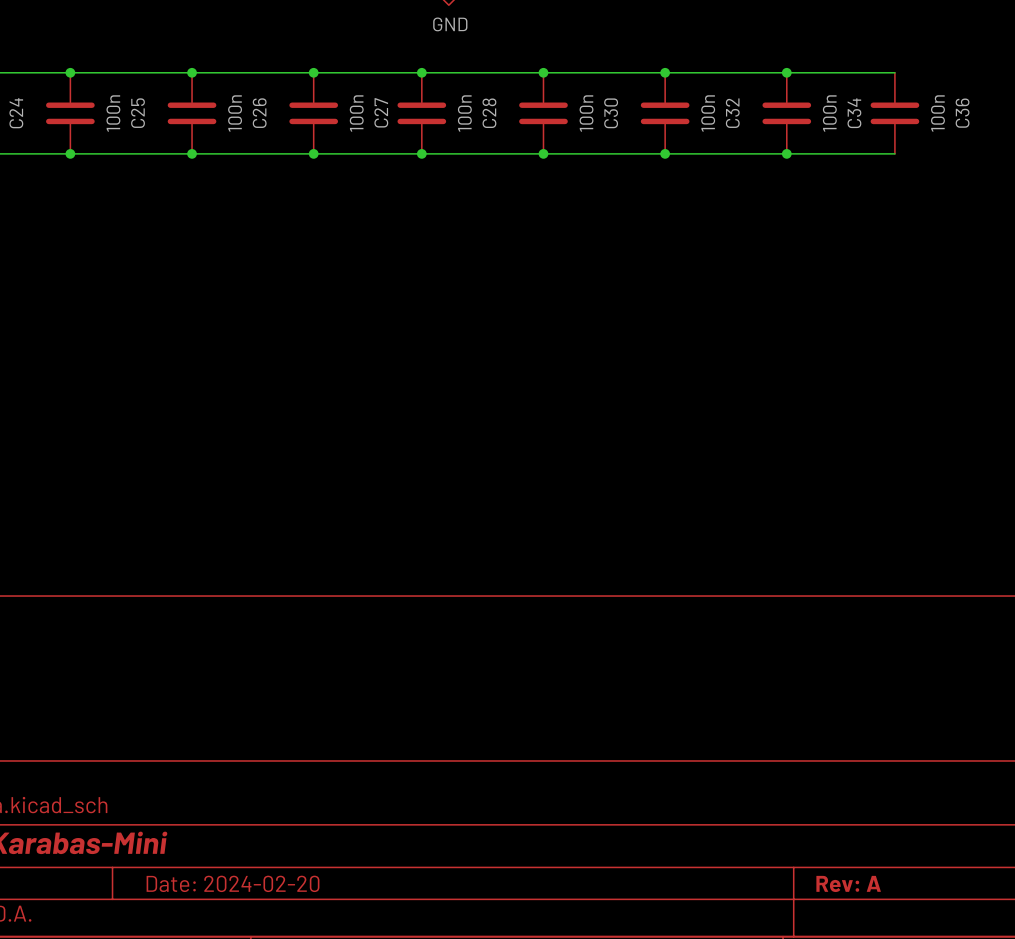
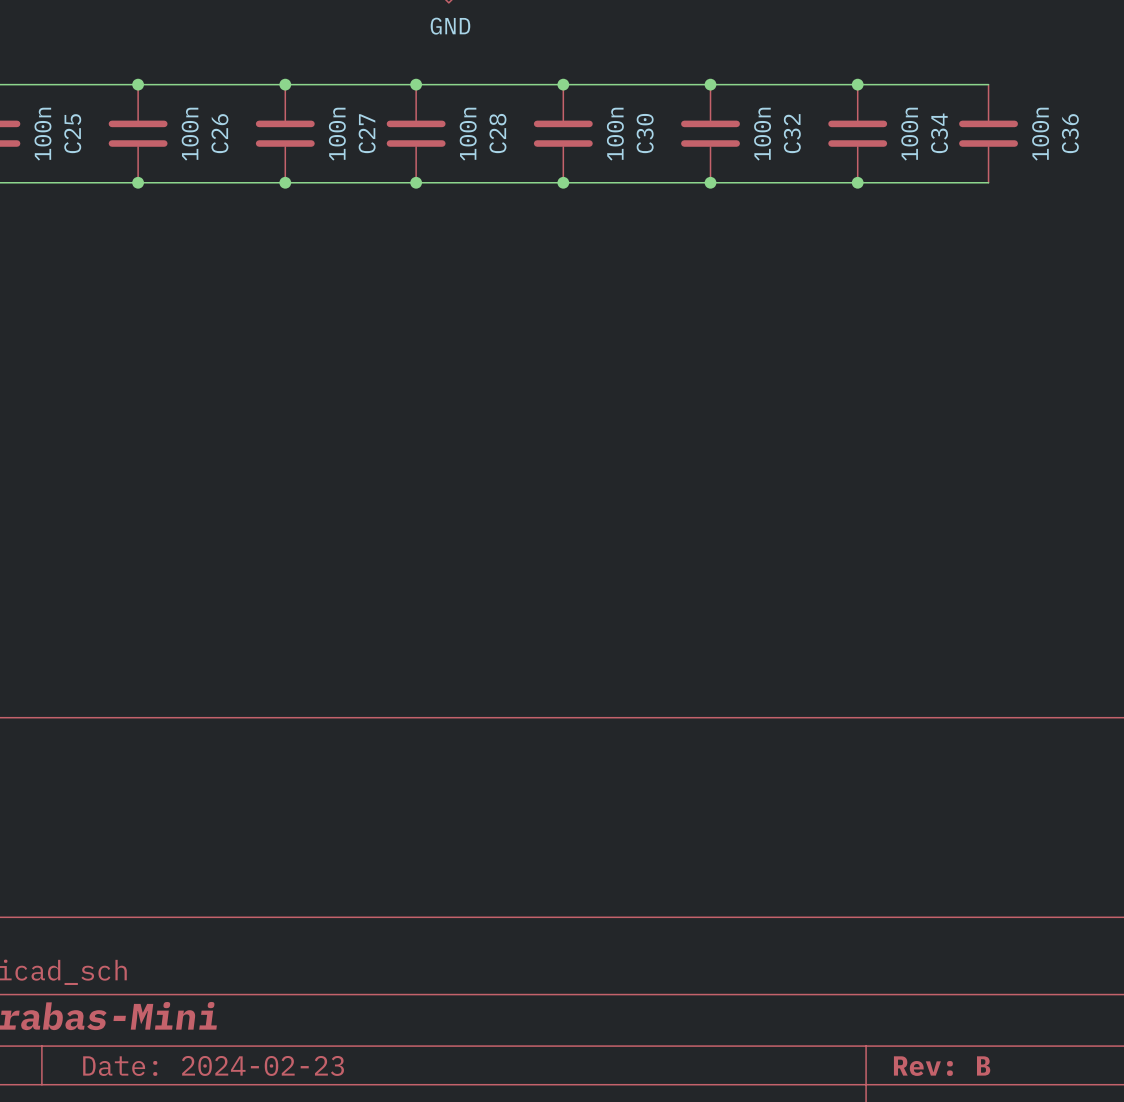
title block: Date: 2024-02-20 (233, 883) -> Date: 2024-02-23 (213, 1065)
title block: Rev: A (848, 883) -> Rev: B (942, 1066)

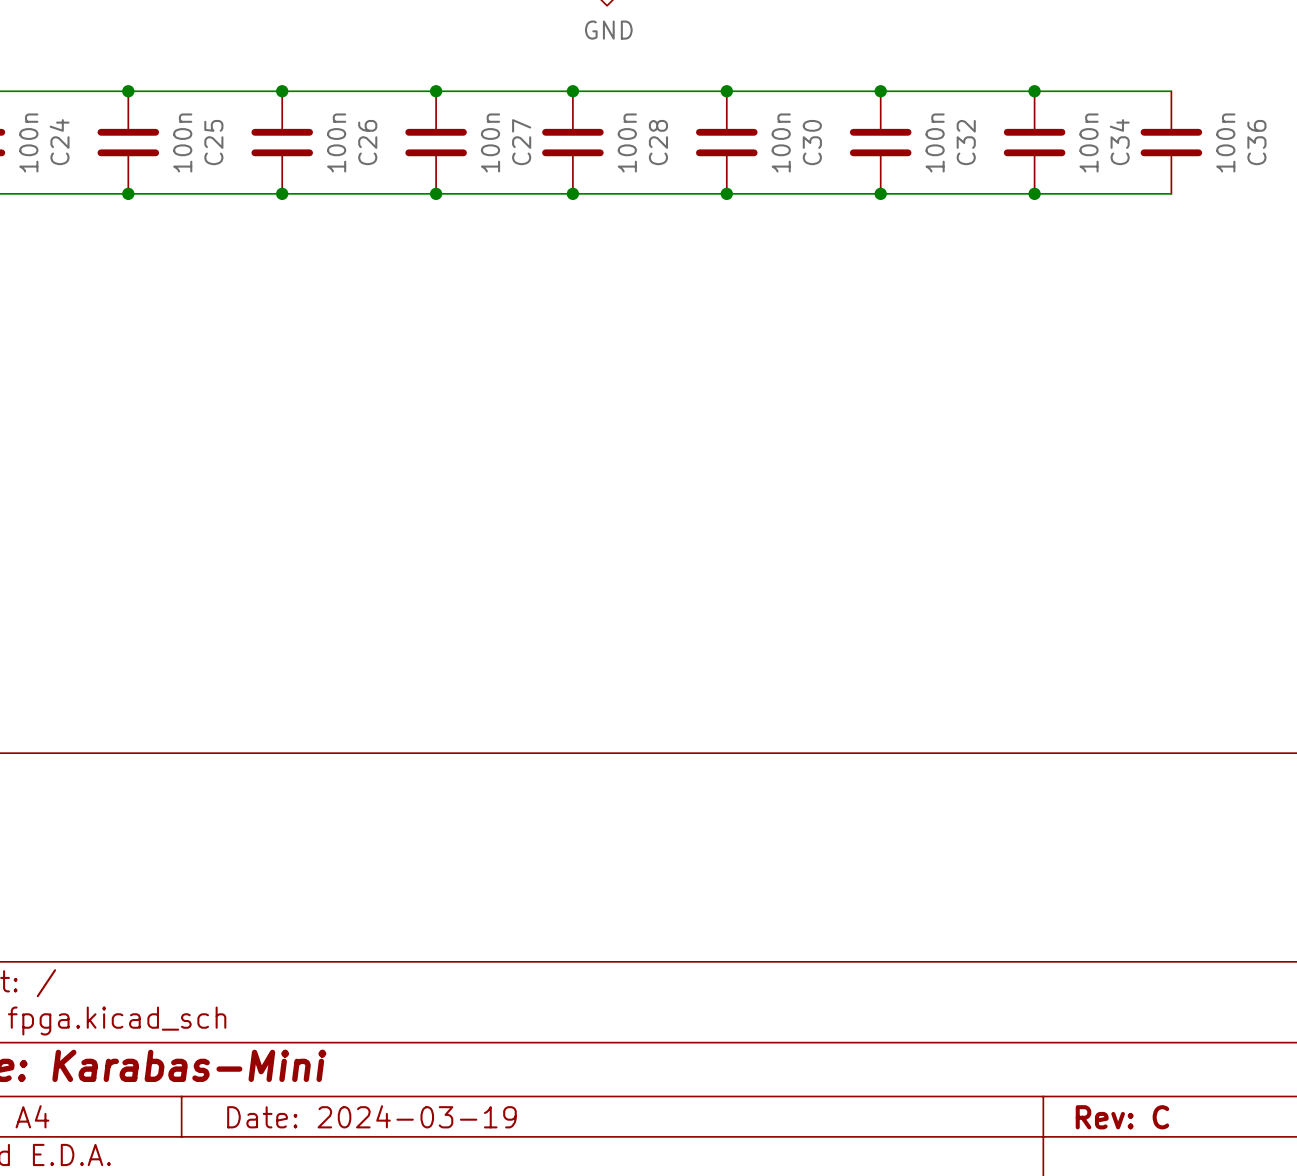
title block: Date: 2024-02-23 (213, 1065) -> Date: 2024-03-19 (371, 1116)
title block: Rev: B (942, 1066) -> Rev: C (1122, 1117)

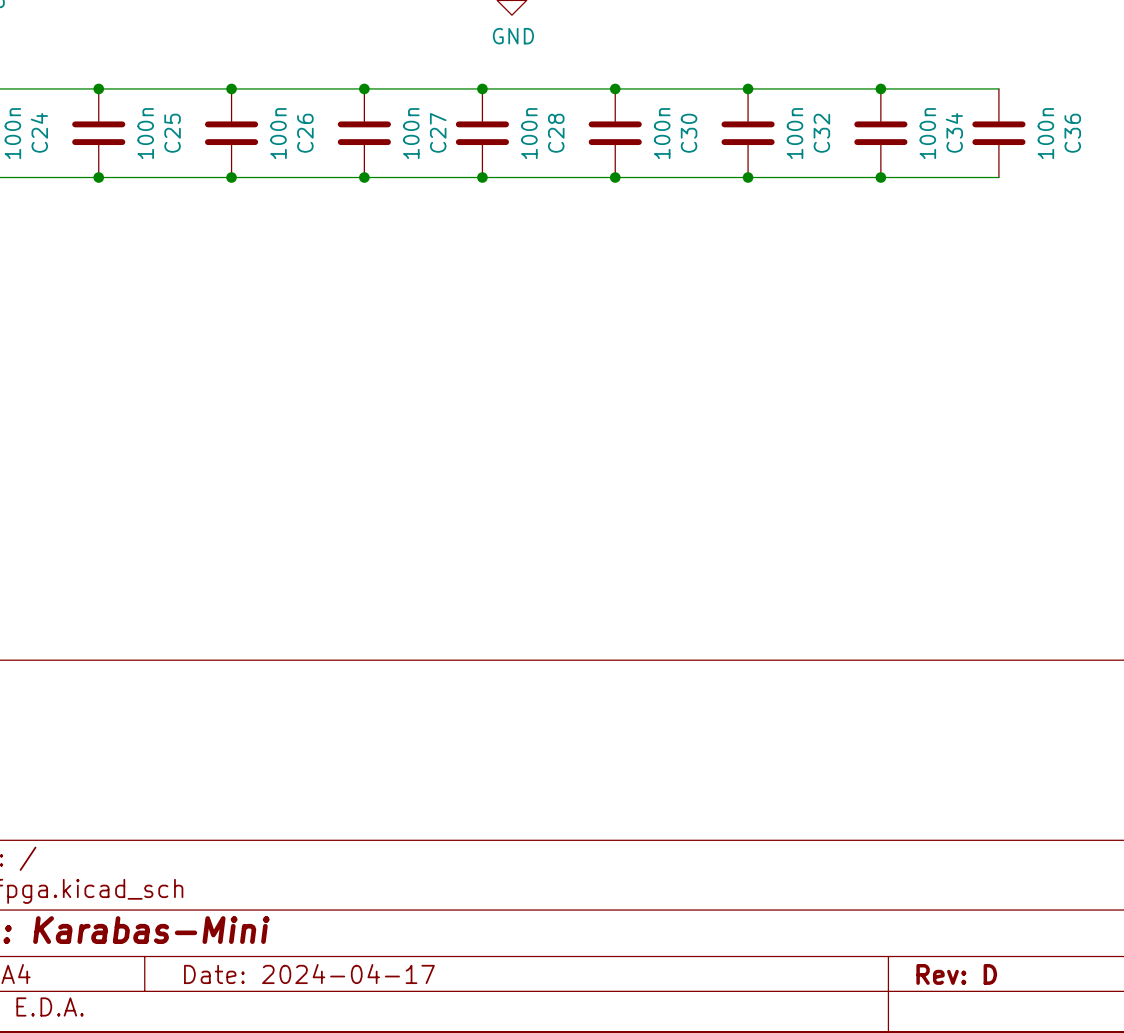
title block: Date: 2024-03-19 (371, 1116) -> Date: 2024-04-17 (309, 974)
title block: Rev: C (1122, 1117) -> Rev: D (956, 974)

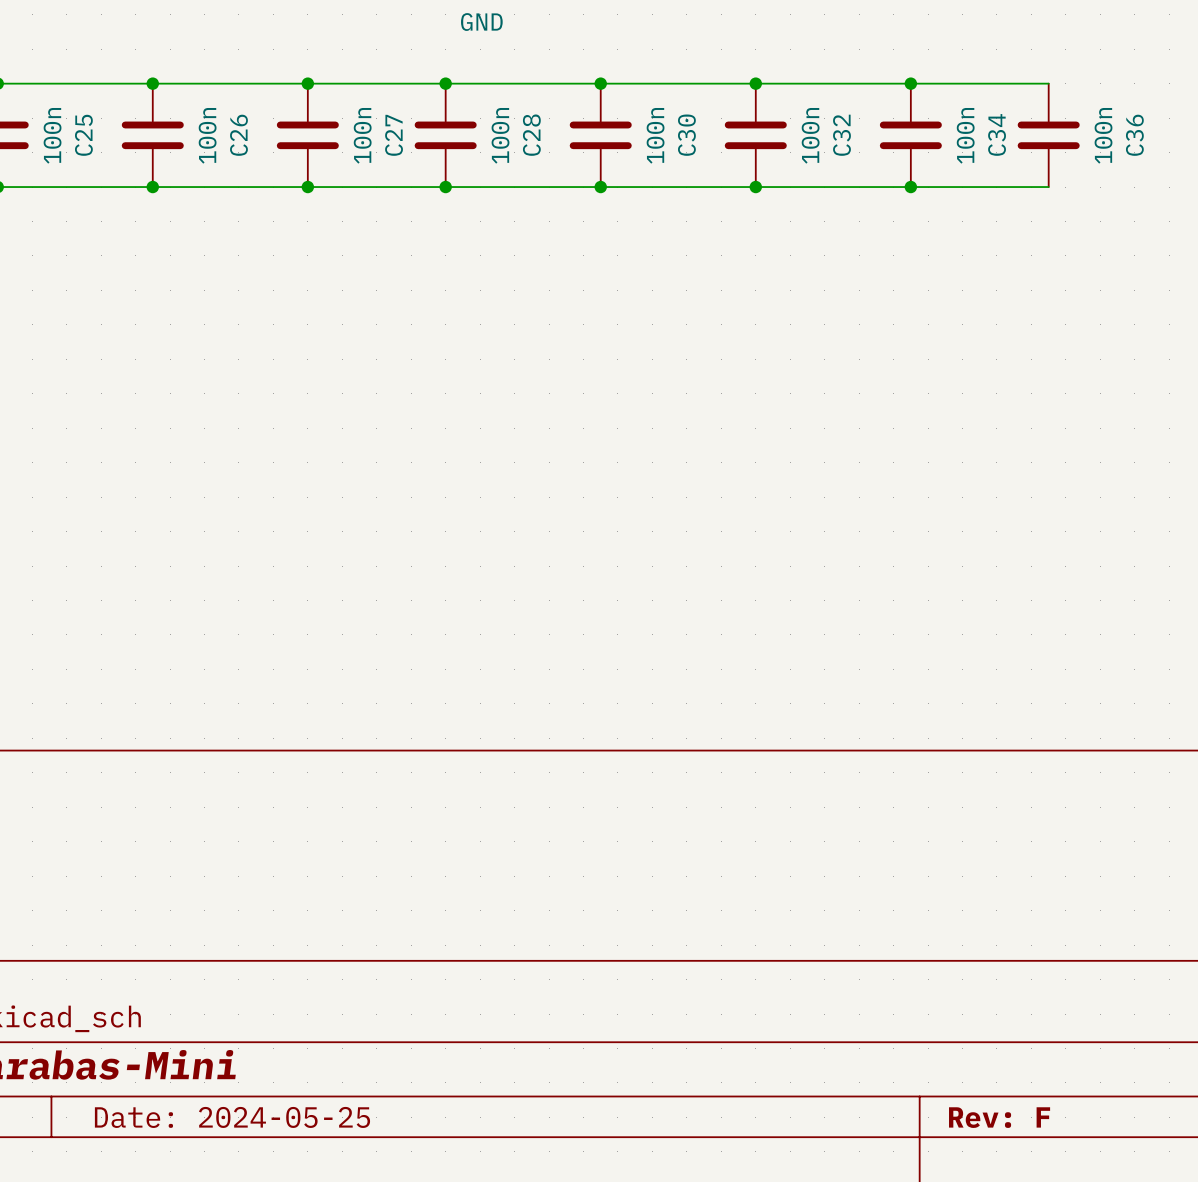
title block: Date: 2024-04-17 (309, 974) -> Date: 2024-05-25 (232, 1117)
title block: Rev: D (956, 974) -> Rev: F (999, 1117)

